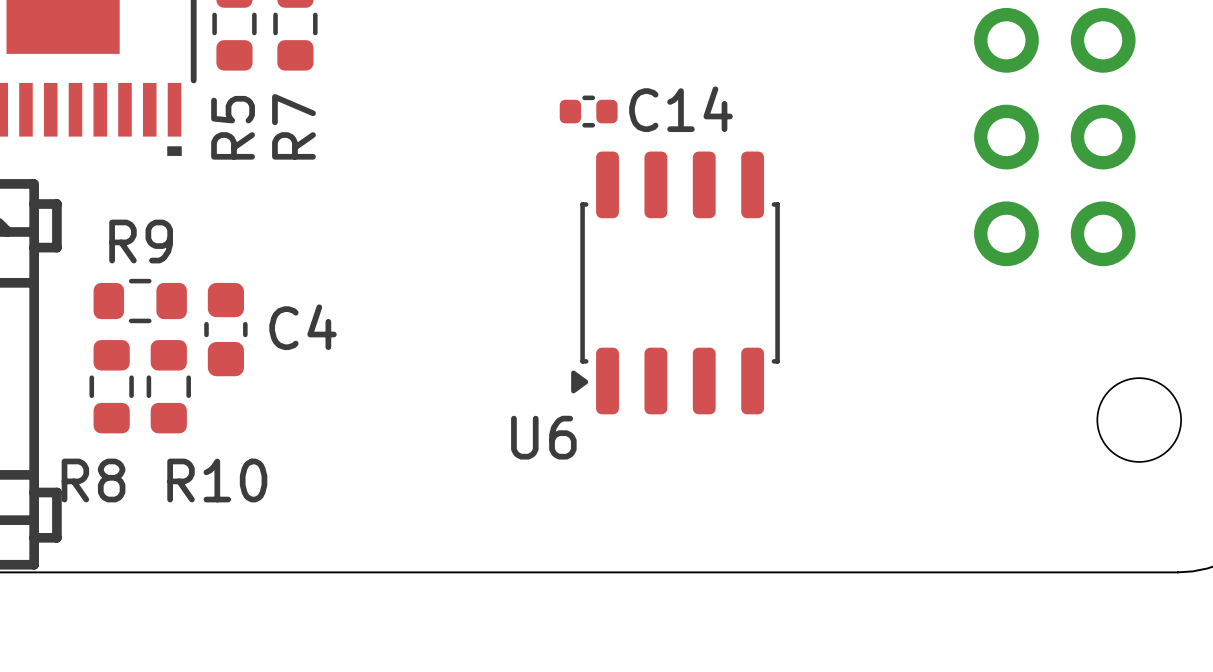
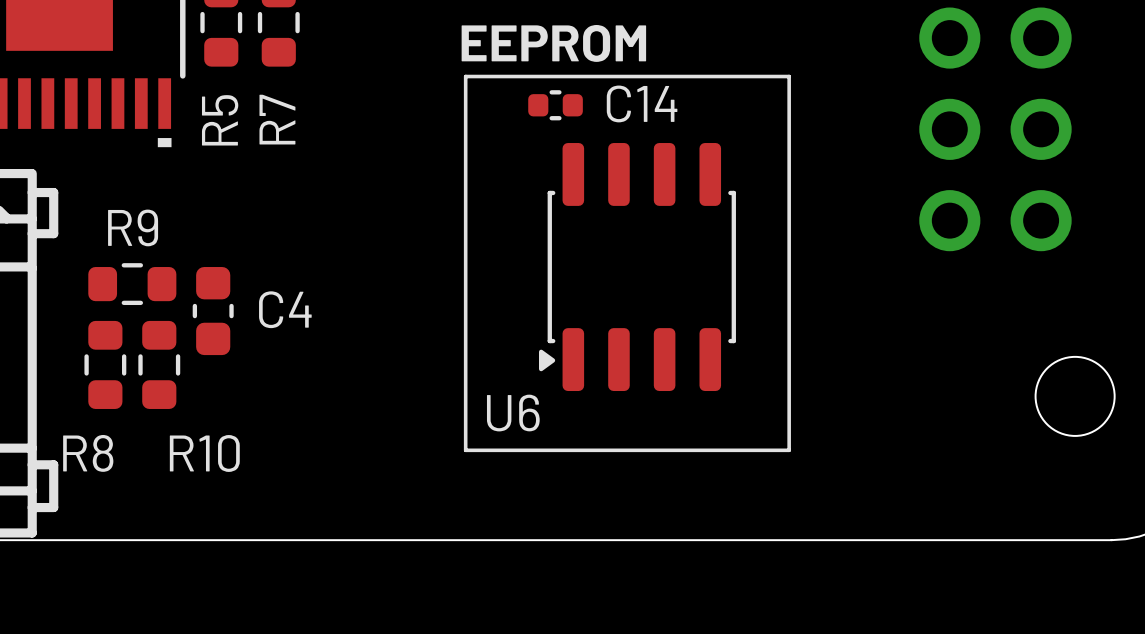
text: none -> EEPROM (553, 43)
line: none -> (465, 76) (789, 76) (789, 450) (465, 450) (465, 76)

